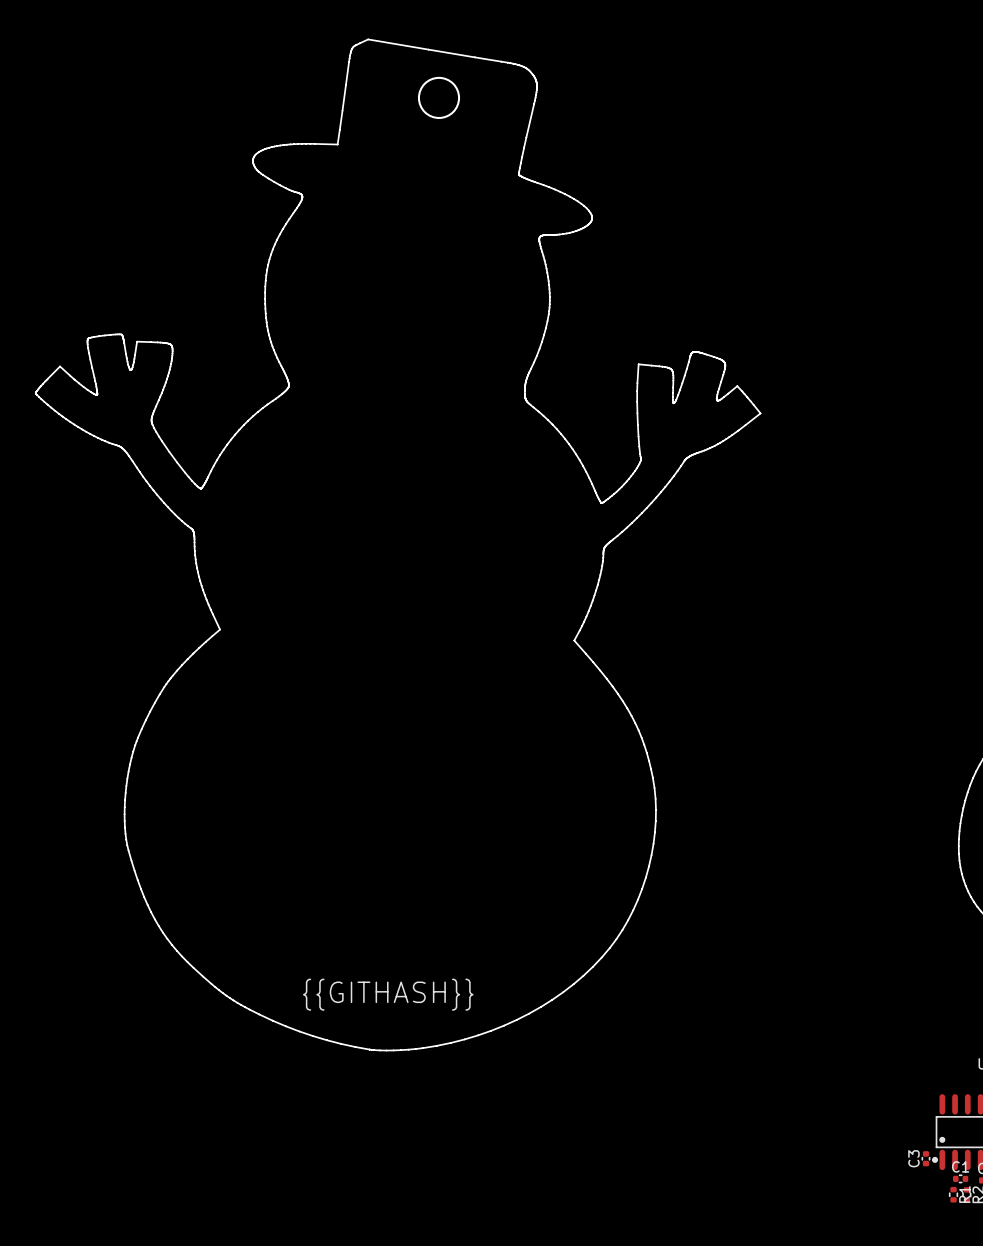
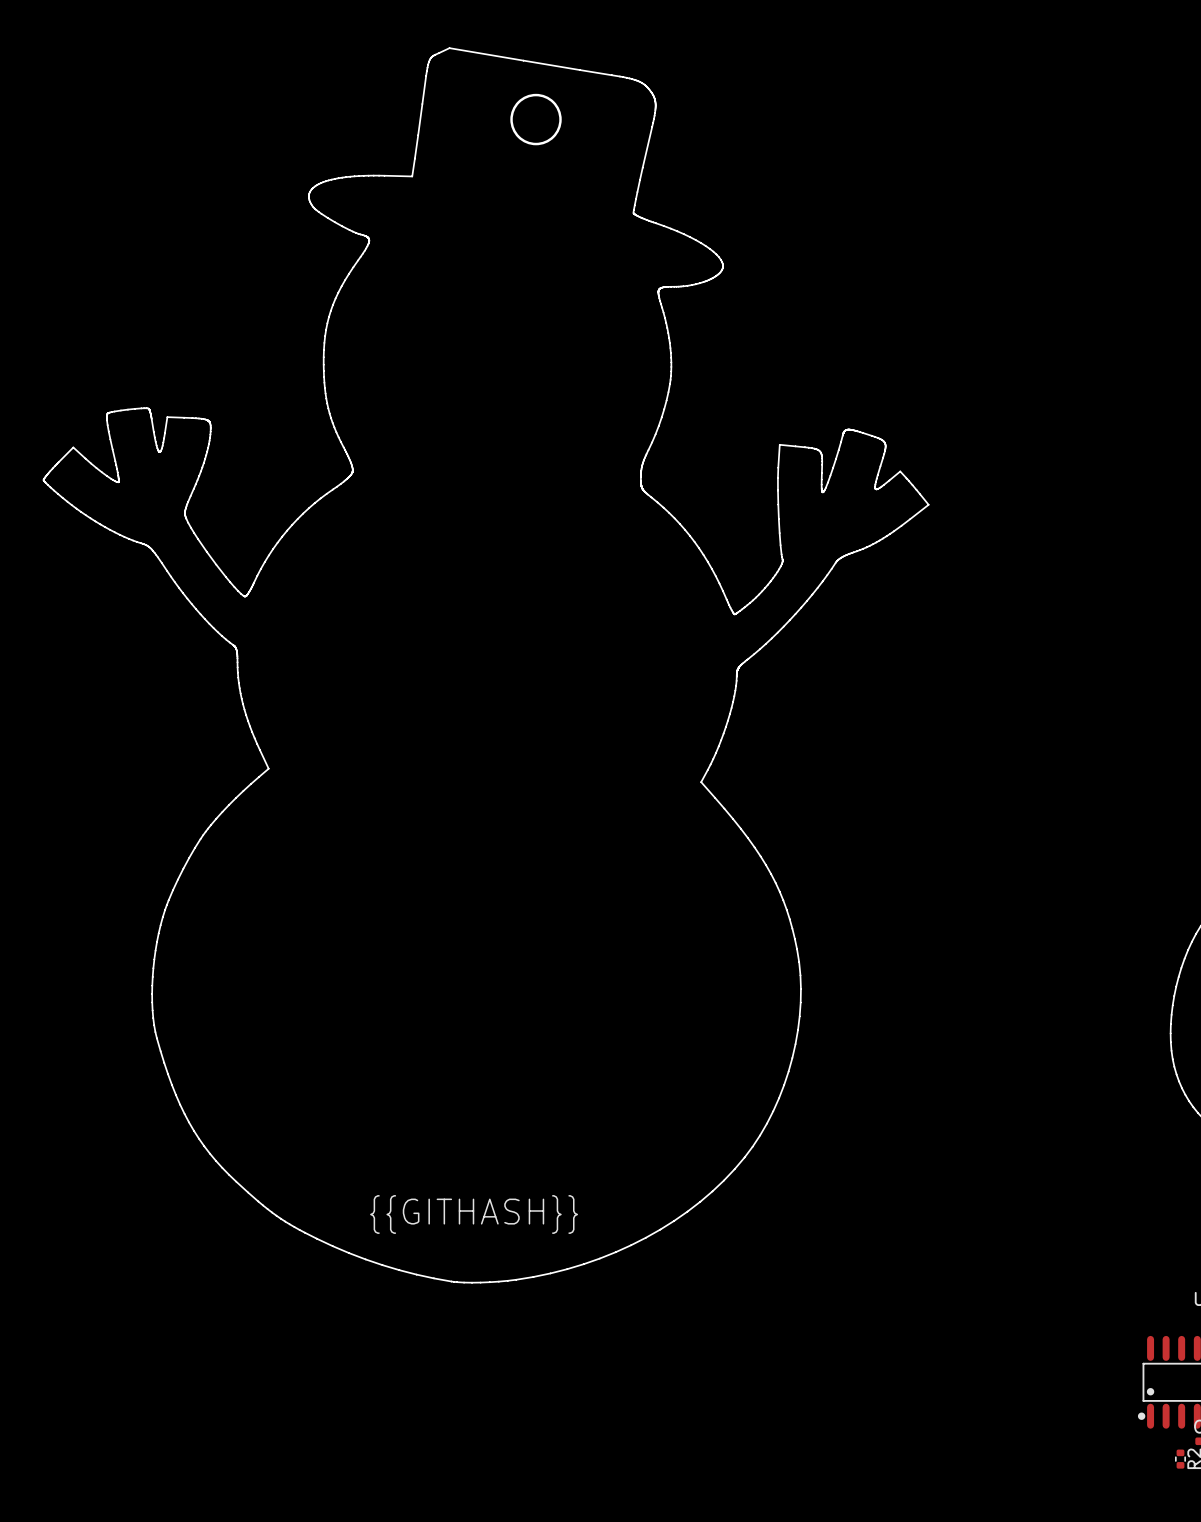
C3: (925, 1158) -> none
C1: (960, 1178) -> none
R1: (953, 1194) -> none

